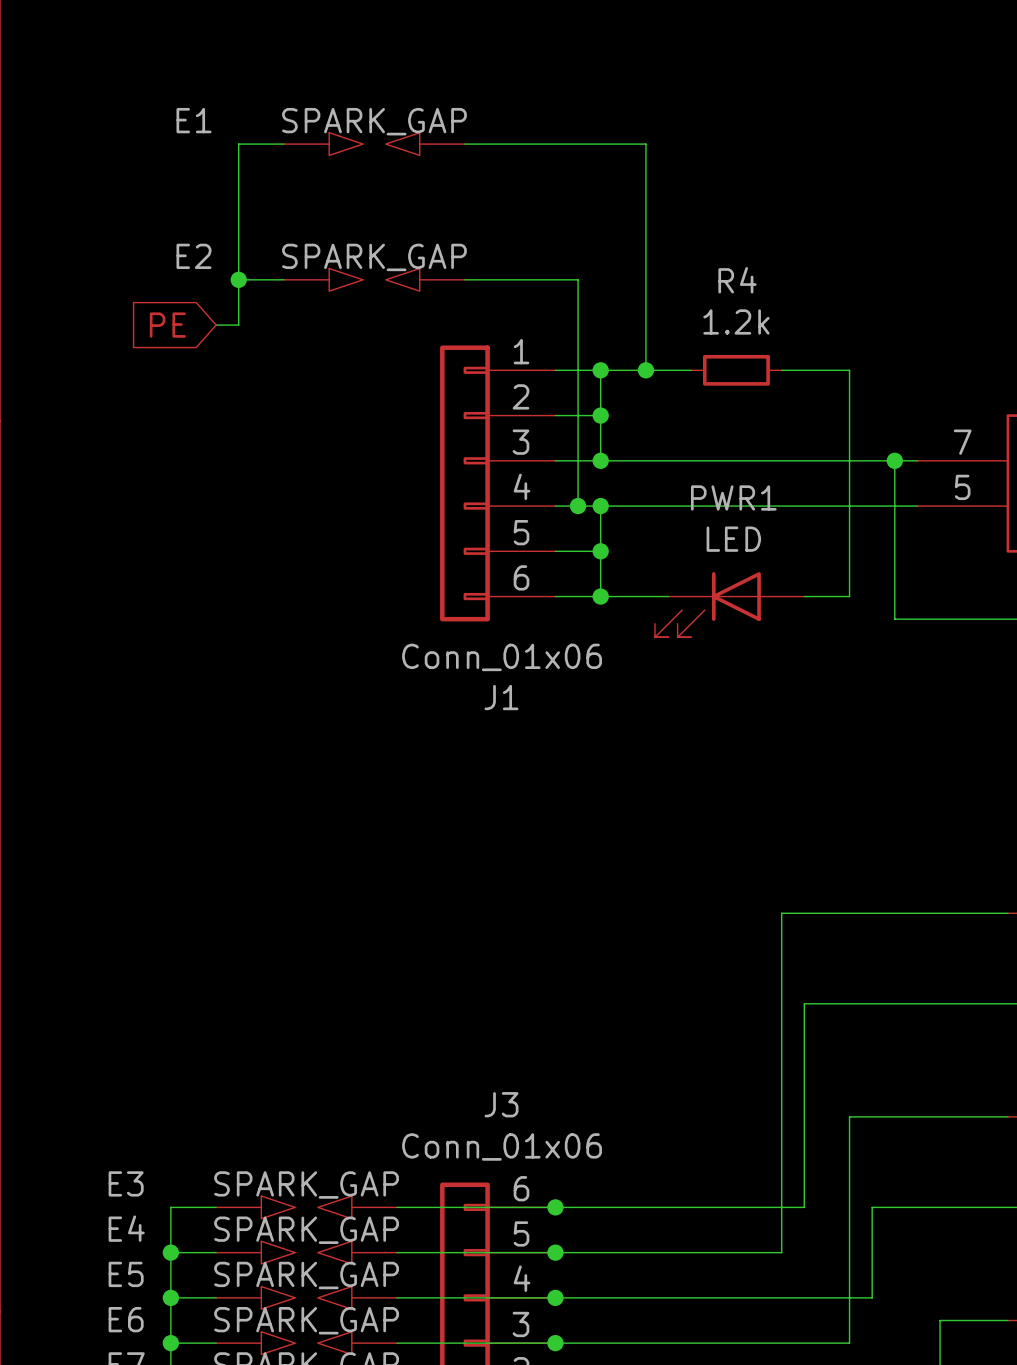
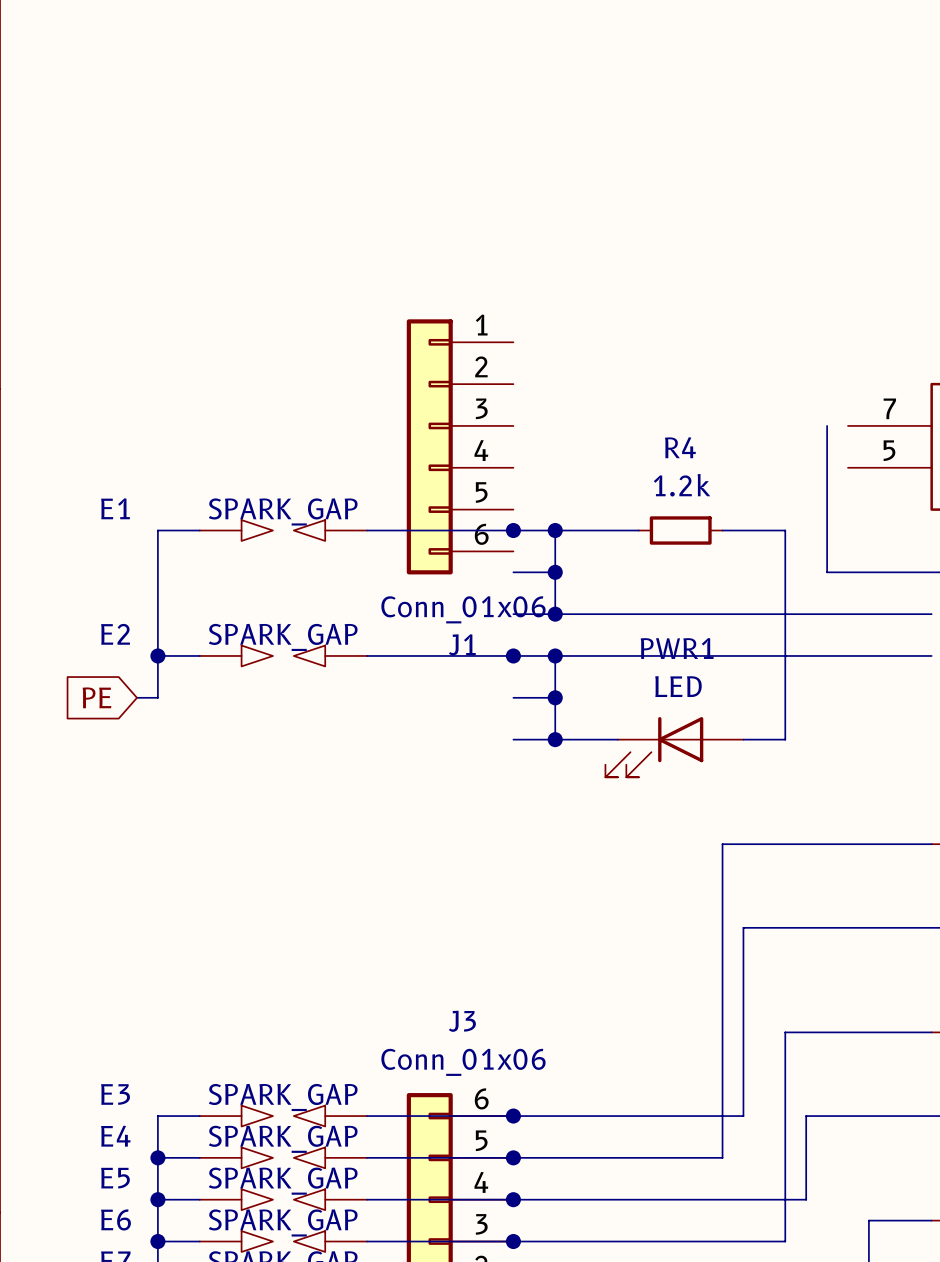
wire: (283, 144) (238, 144) (238, 325) (216, 325) -> (199, 530) (157, 530) (157, 697) (137, 697)
E1 position: (374, 144) -> (283, 530)
wire: (464, 144) (645, 144) (645, 370) -> none
wire: (238, 279) (283, 279) -> (157, 655) (199, 655)
junction: (238, 279) -> none
E2 position: (374, 279) -> (283, 655)
wire: (464, 279) (578, 279) (578, 506) -> none
global label position: PE (167, 325) -> PE (96, 697)
wire: (555, 370) (691, 370) -> none
wire: (600, 370) (600, 460) -> (555, 655) (555, 739)
junction: (600, 370) -> none
junction: (645, 370) -> none
R4 position: (736, 370) -> (680, 530)
wire: (781, 370) (849, 370) (849, 573) -> (722, 530) (785, 530)
wire: (555, 415) (600, 415) -> (513, 572) (555, 572)
junction: (600, 415) -> none
wire: (555, 460) (917, 460) -> none
junction: (600, 460) -> none
junction: (894, 460) -> none
wire: (555, 506) (917, 506) -> none
junction: (578, 506) -> none
wire: (600, 506) (600, 573) -> (555, 551) (555, 614)
junction: (600, 506) -> none
wire: (555, 551) (600, 551) -> (513, 697) (555, 697)
junction: (600, 551) -> none
wire: none -> (367, 530) (638, 530)
junction: none -> (513, 530)
junction: none -> (555, 530)
wire: (555, 596) (668, 596) -> (513, 739) (617, 739)
junction: (600, 596) -> none
wire: (804, 596) (849, 596) -> (743, 739) (785, 739) (785, 551)
PWR1 position: (729, 604) -> (674, 747)
junction: none -> (555, 572)
wire: none -> (513, 614) (931, 614)
junction: none -> (555, 614)
junction: none -> (157, 655)
wire: none -> (367, 655) (931, 655)
junction: none -> (513, 655)
junction: none -> (555, 655)
junction: none -> (555, 697)
junction: none -> (555, 739)

